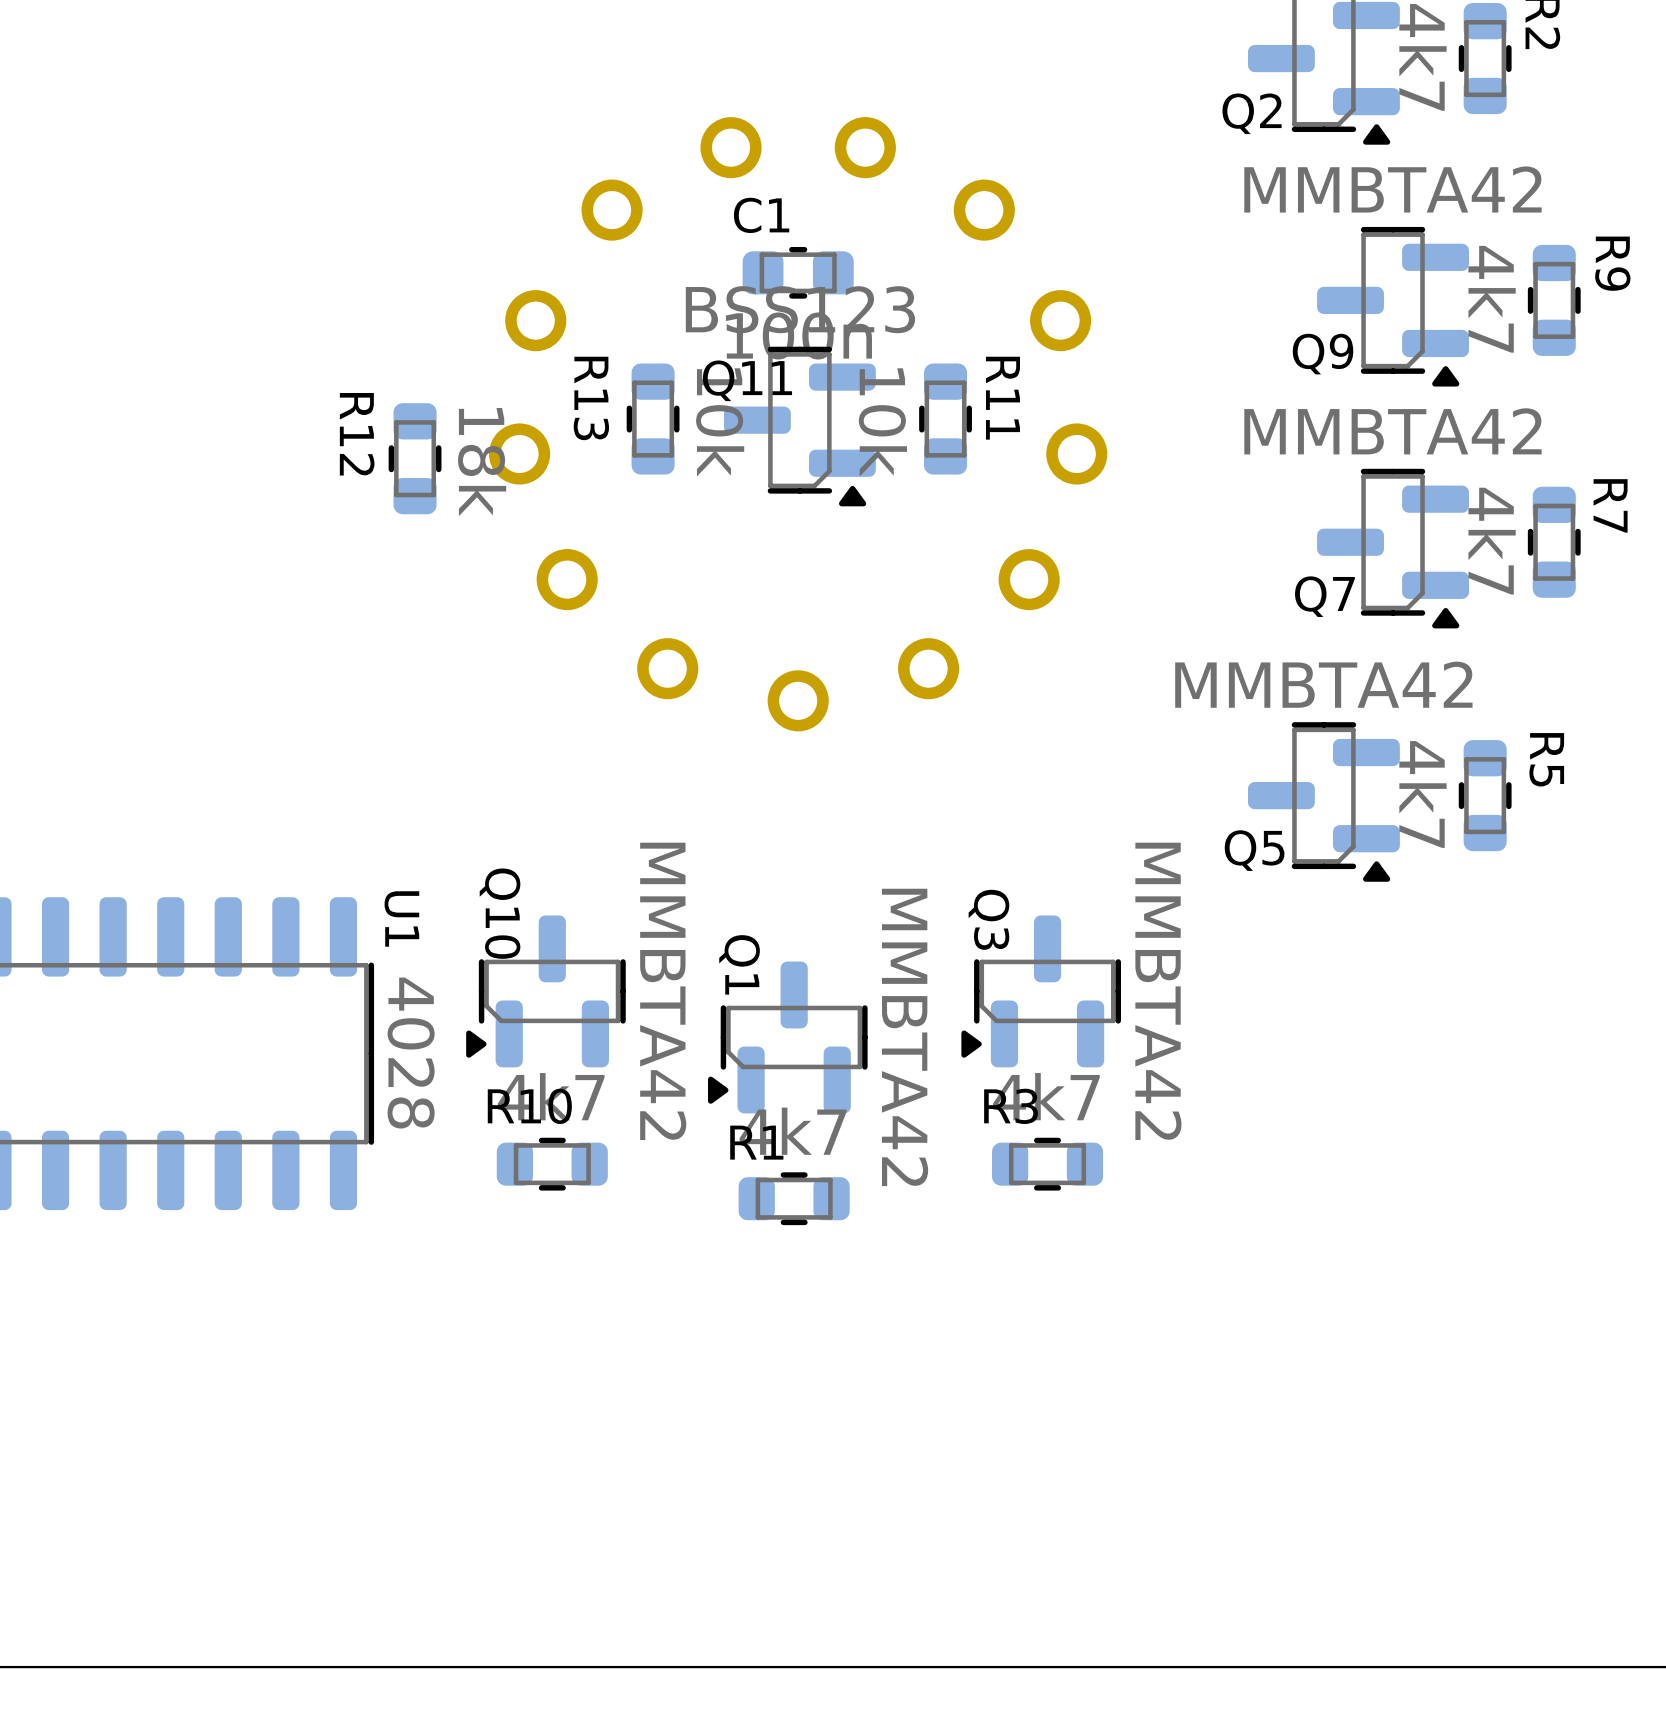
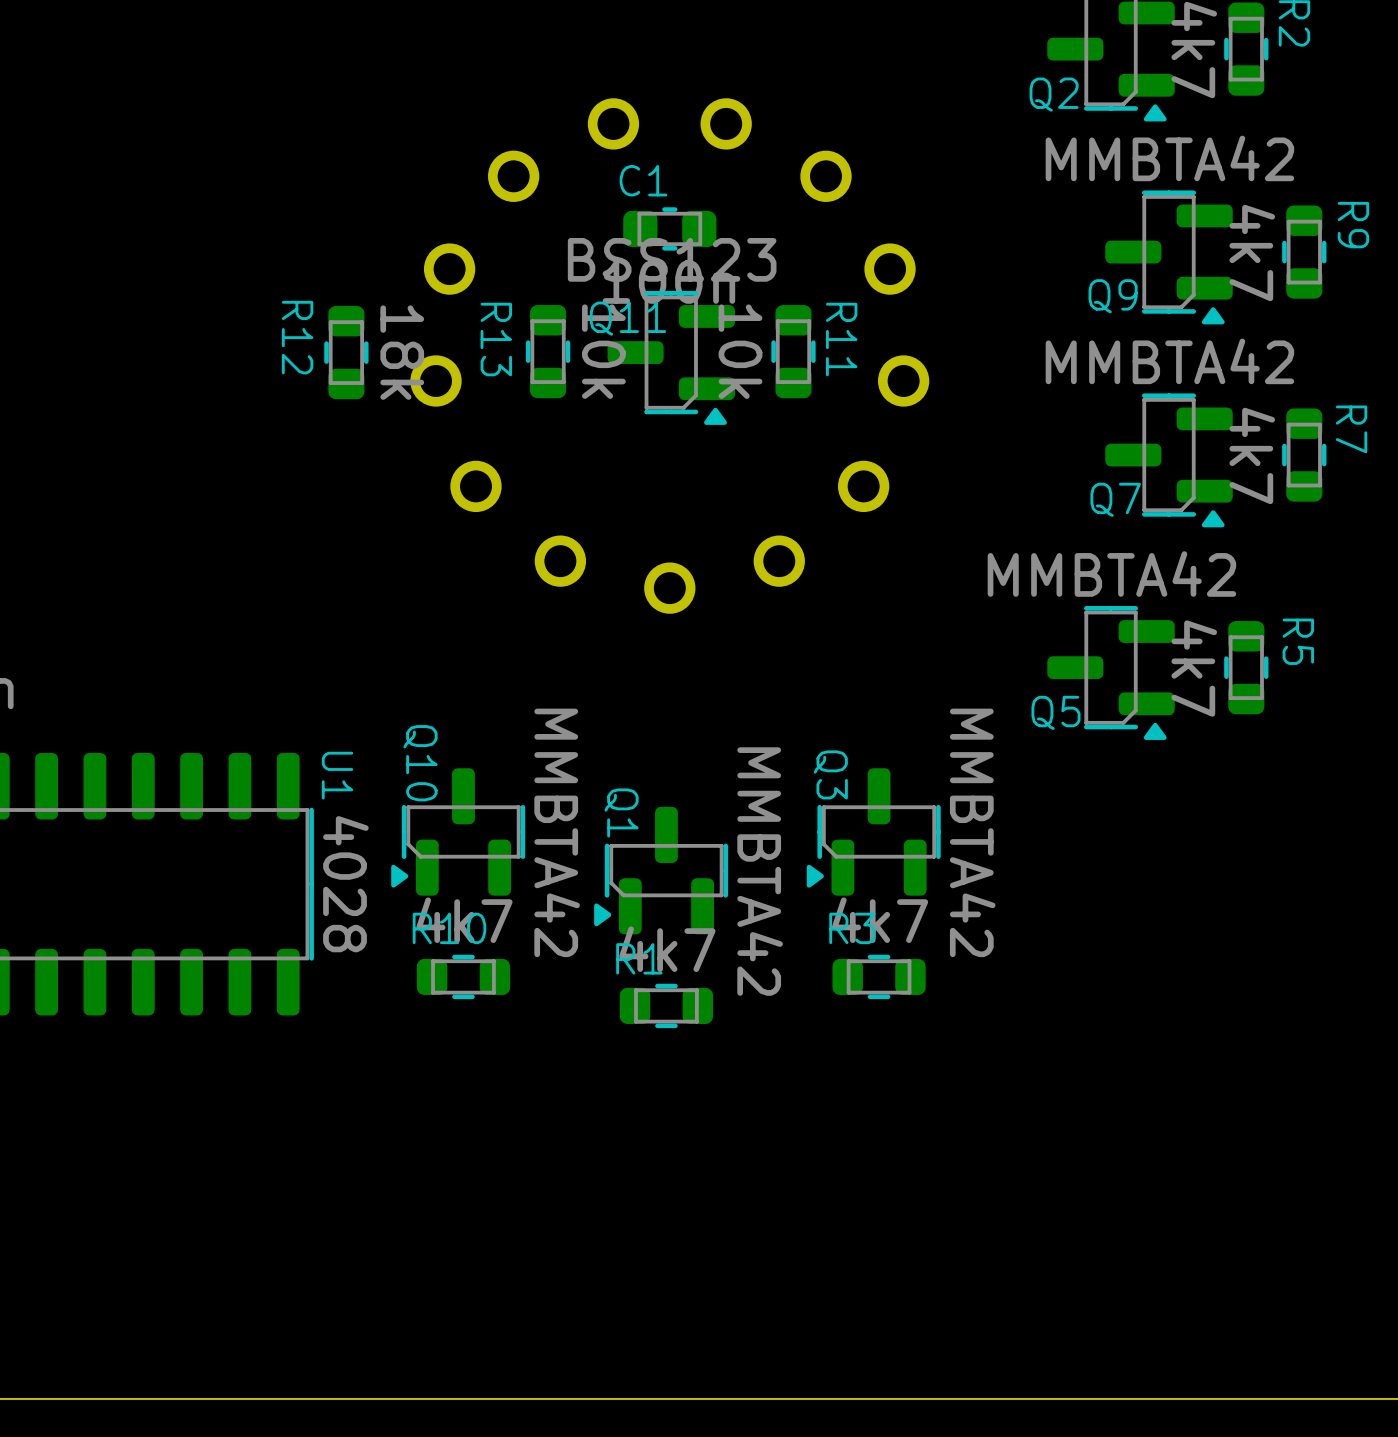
R12 position: (415, 458) -> (346, 352)

